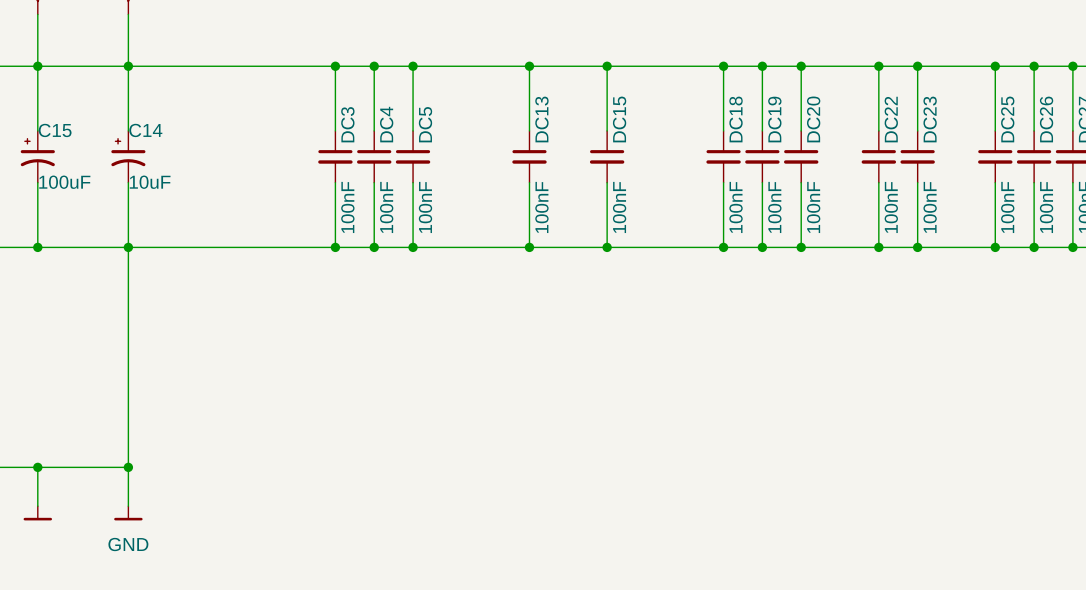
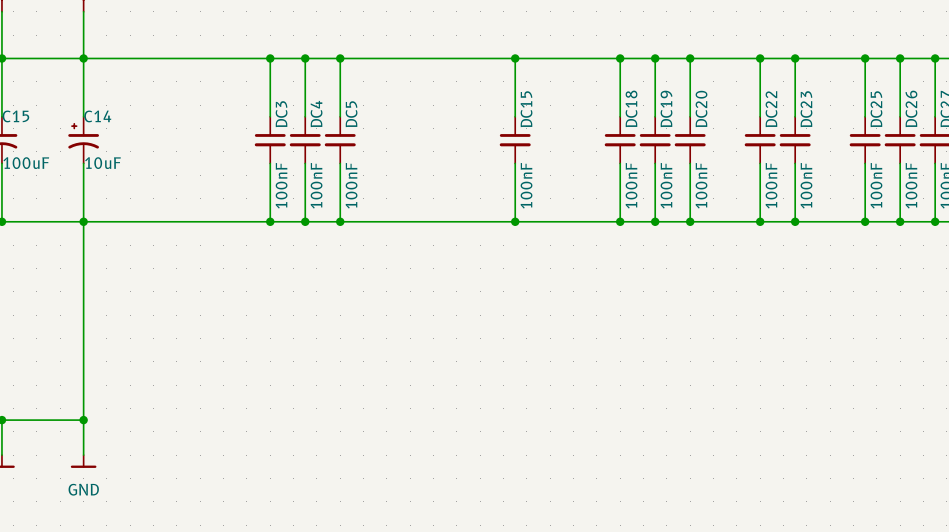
wire: (529, 66) (529, 130) -> none
junction: (529, 66) -> none
DC13: 100nF (529, 156) -> none
wire: (529, 182) (529, 247) -> none
junction: (529, 247) -> none

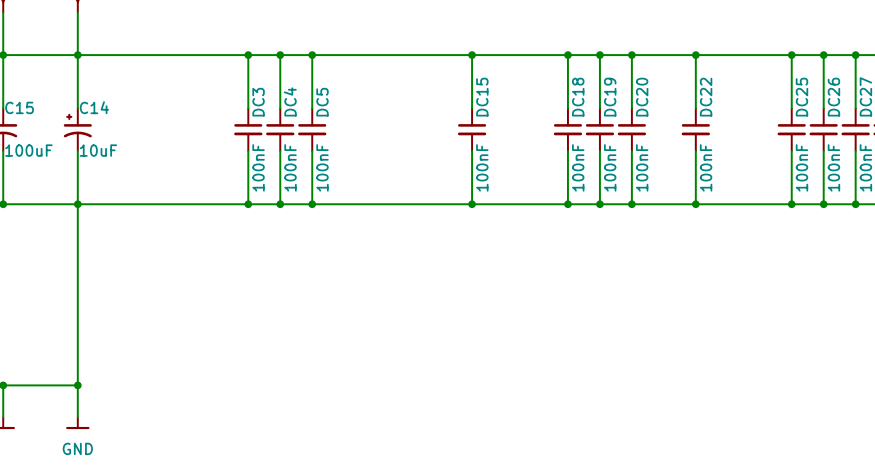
wire: (795, 58) (795, 116) -> none
junction: (795, 58) -> none
DC23: 100nF (795, 140) -> none
wire: (795, 163) (795, 221) -> none
junction: (795, 221) -> none

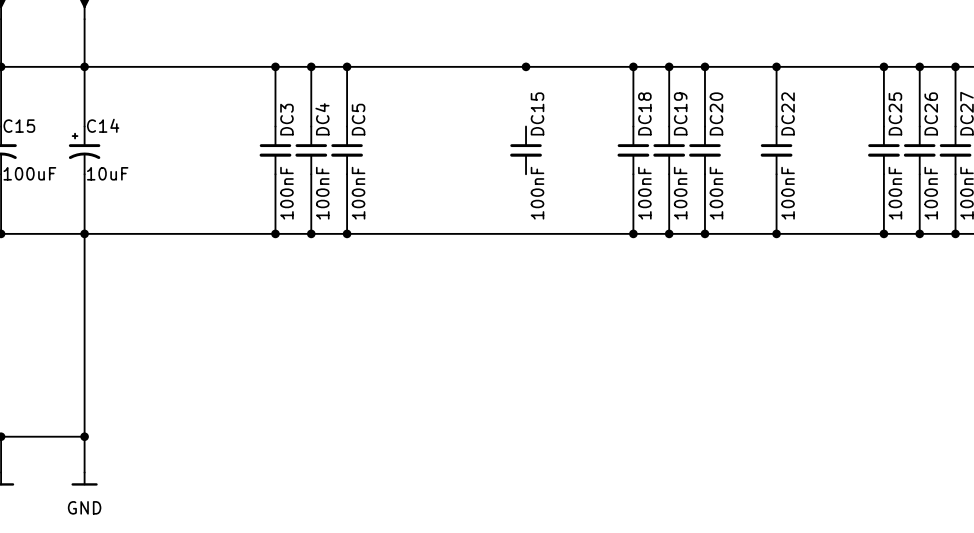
wire: (472, 55) (472, 108) -> none
wire: (472, 150) (472, 204) -> none
junction: (472, 204) -> none

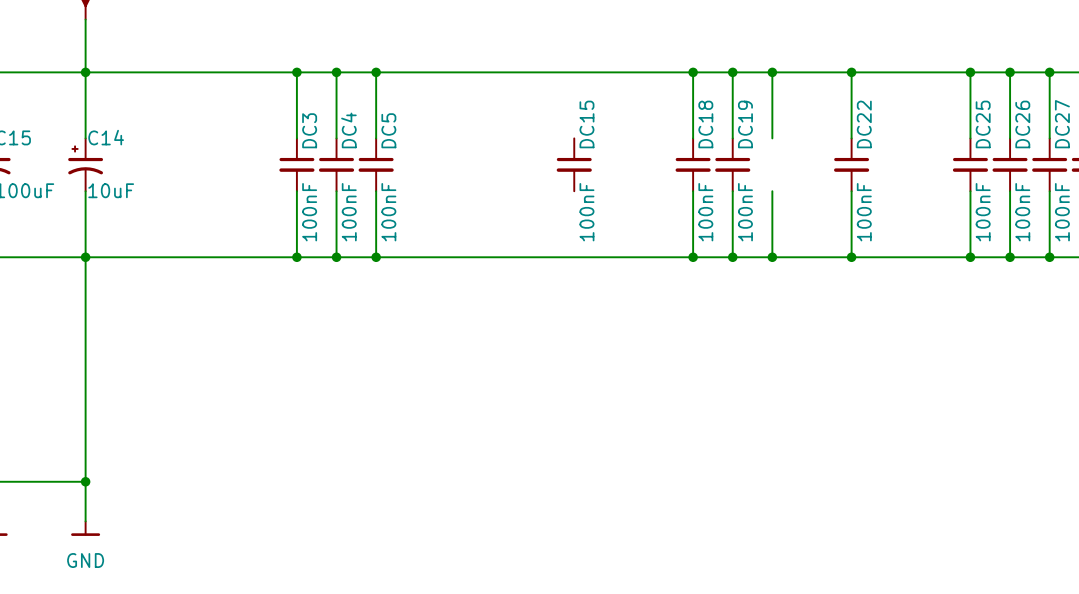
junction: (526, 66) -> none
DC20: 100nF (704, 150) -> none

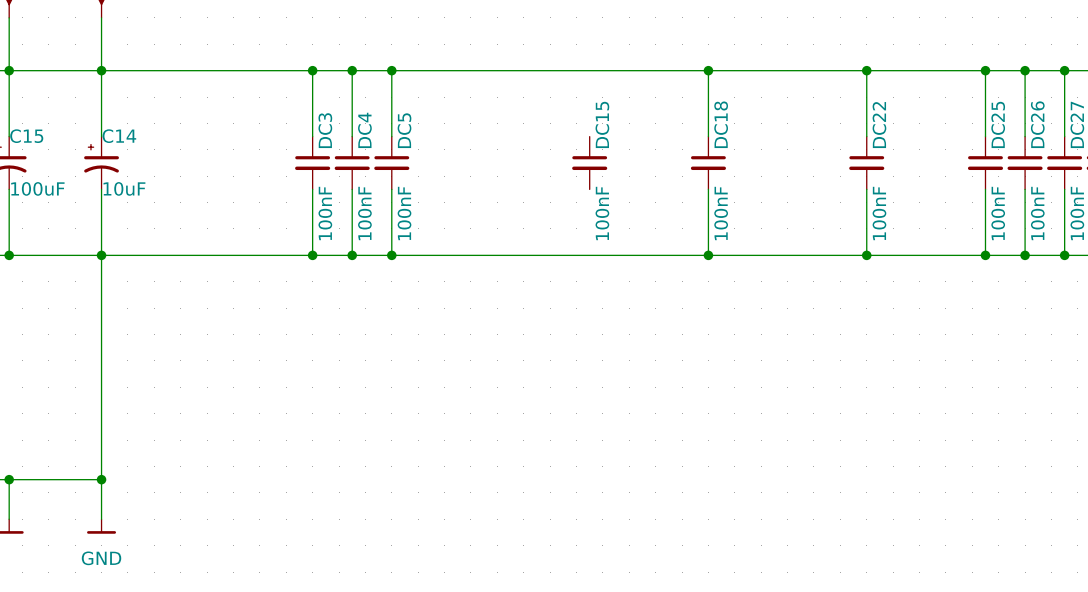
wire: (732, 72) (732, 138) -> none
junction: (732, 72) -> none
wire: (772, 72) (772, 138) -> none
junction: (772, 72) -> none
DC19: 100nF (732, 164) -> none
wire: (732, 191) (732, 257) -> none
wire: (772, 191) (772, 257) -> none
junction: (732, 257) -> none
junction: (772, 257) -> none

